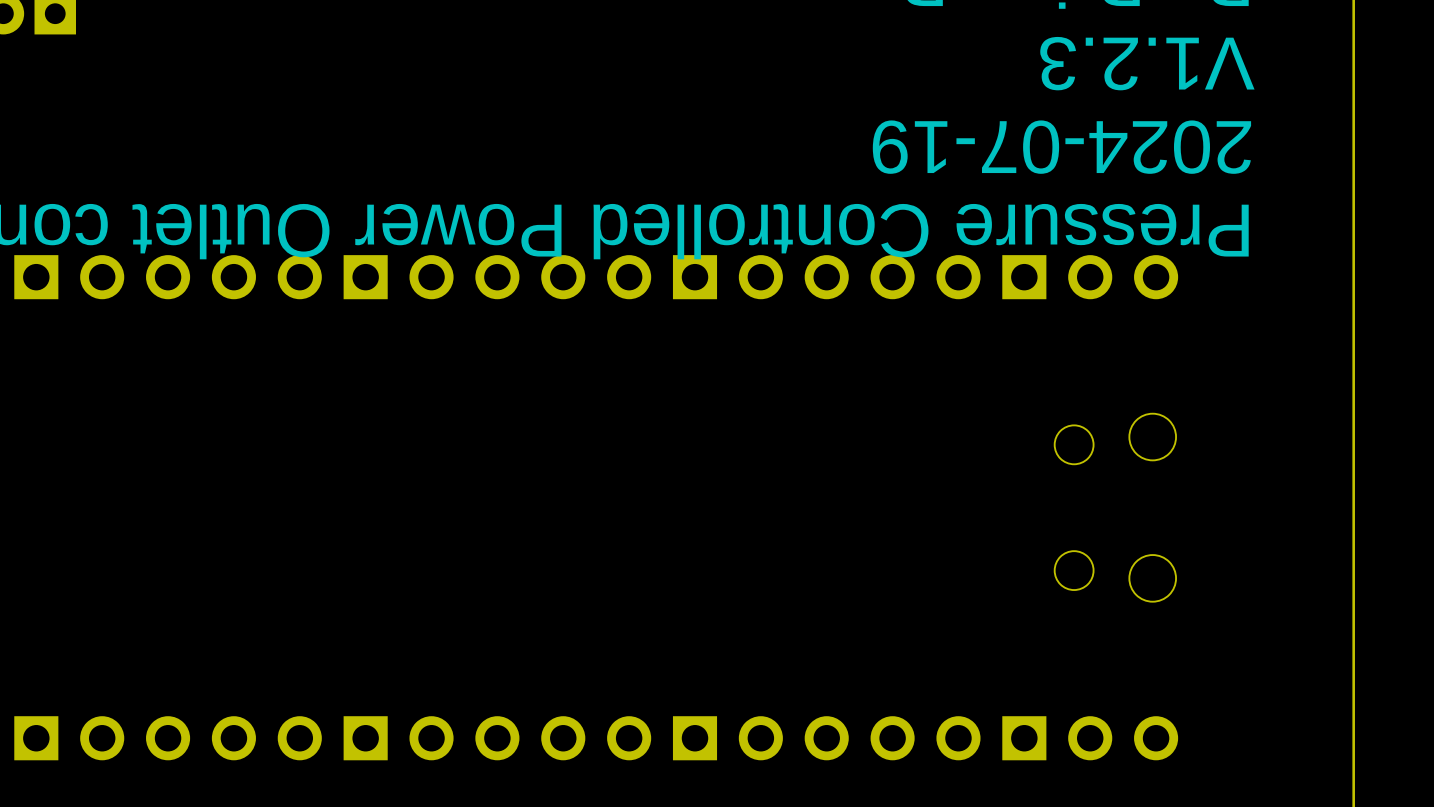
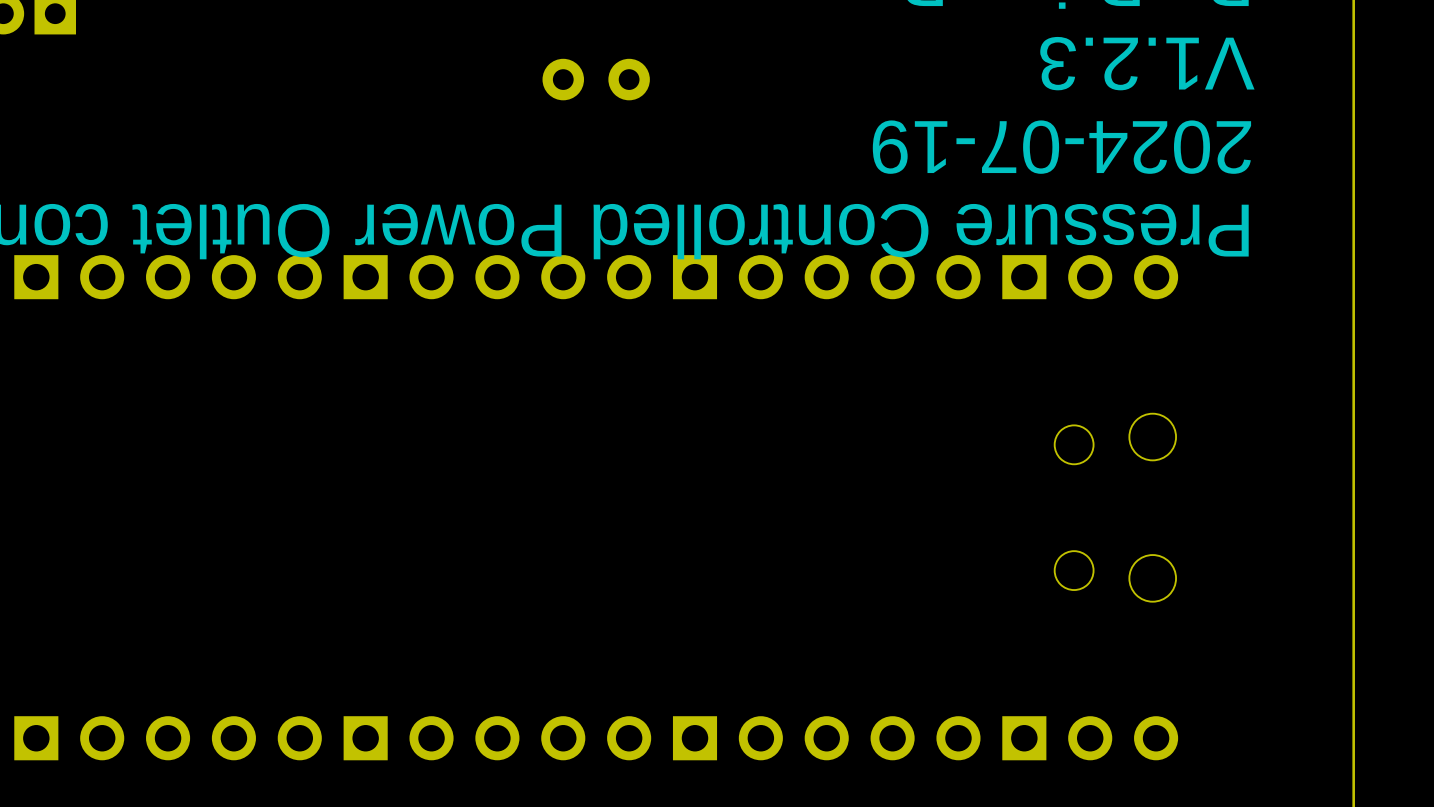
part: none -> (596, 79)

